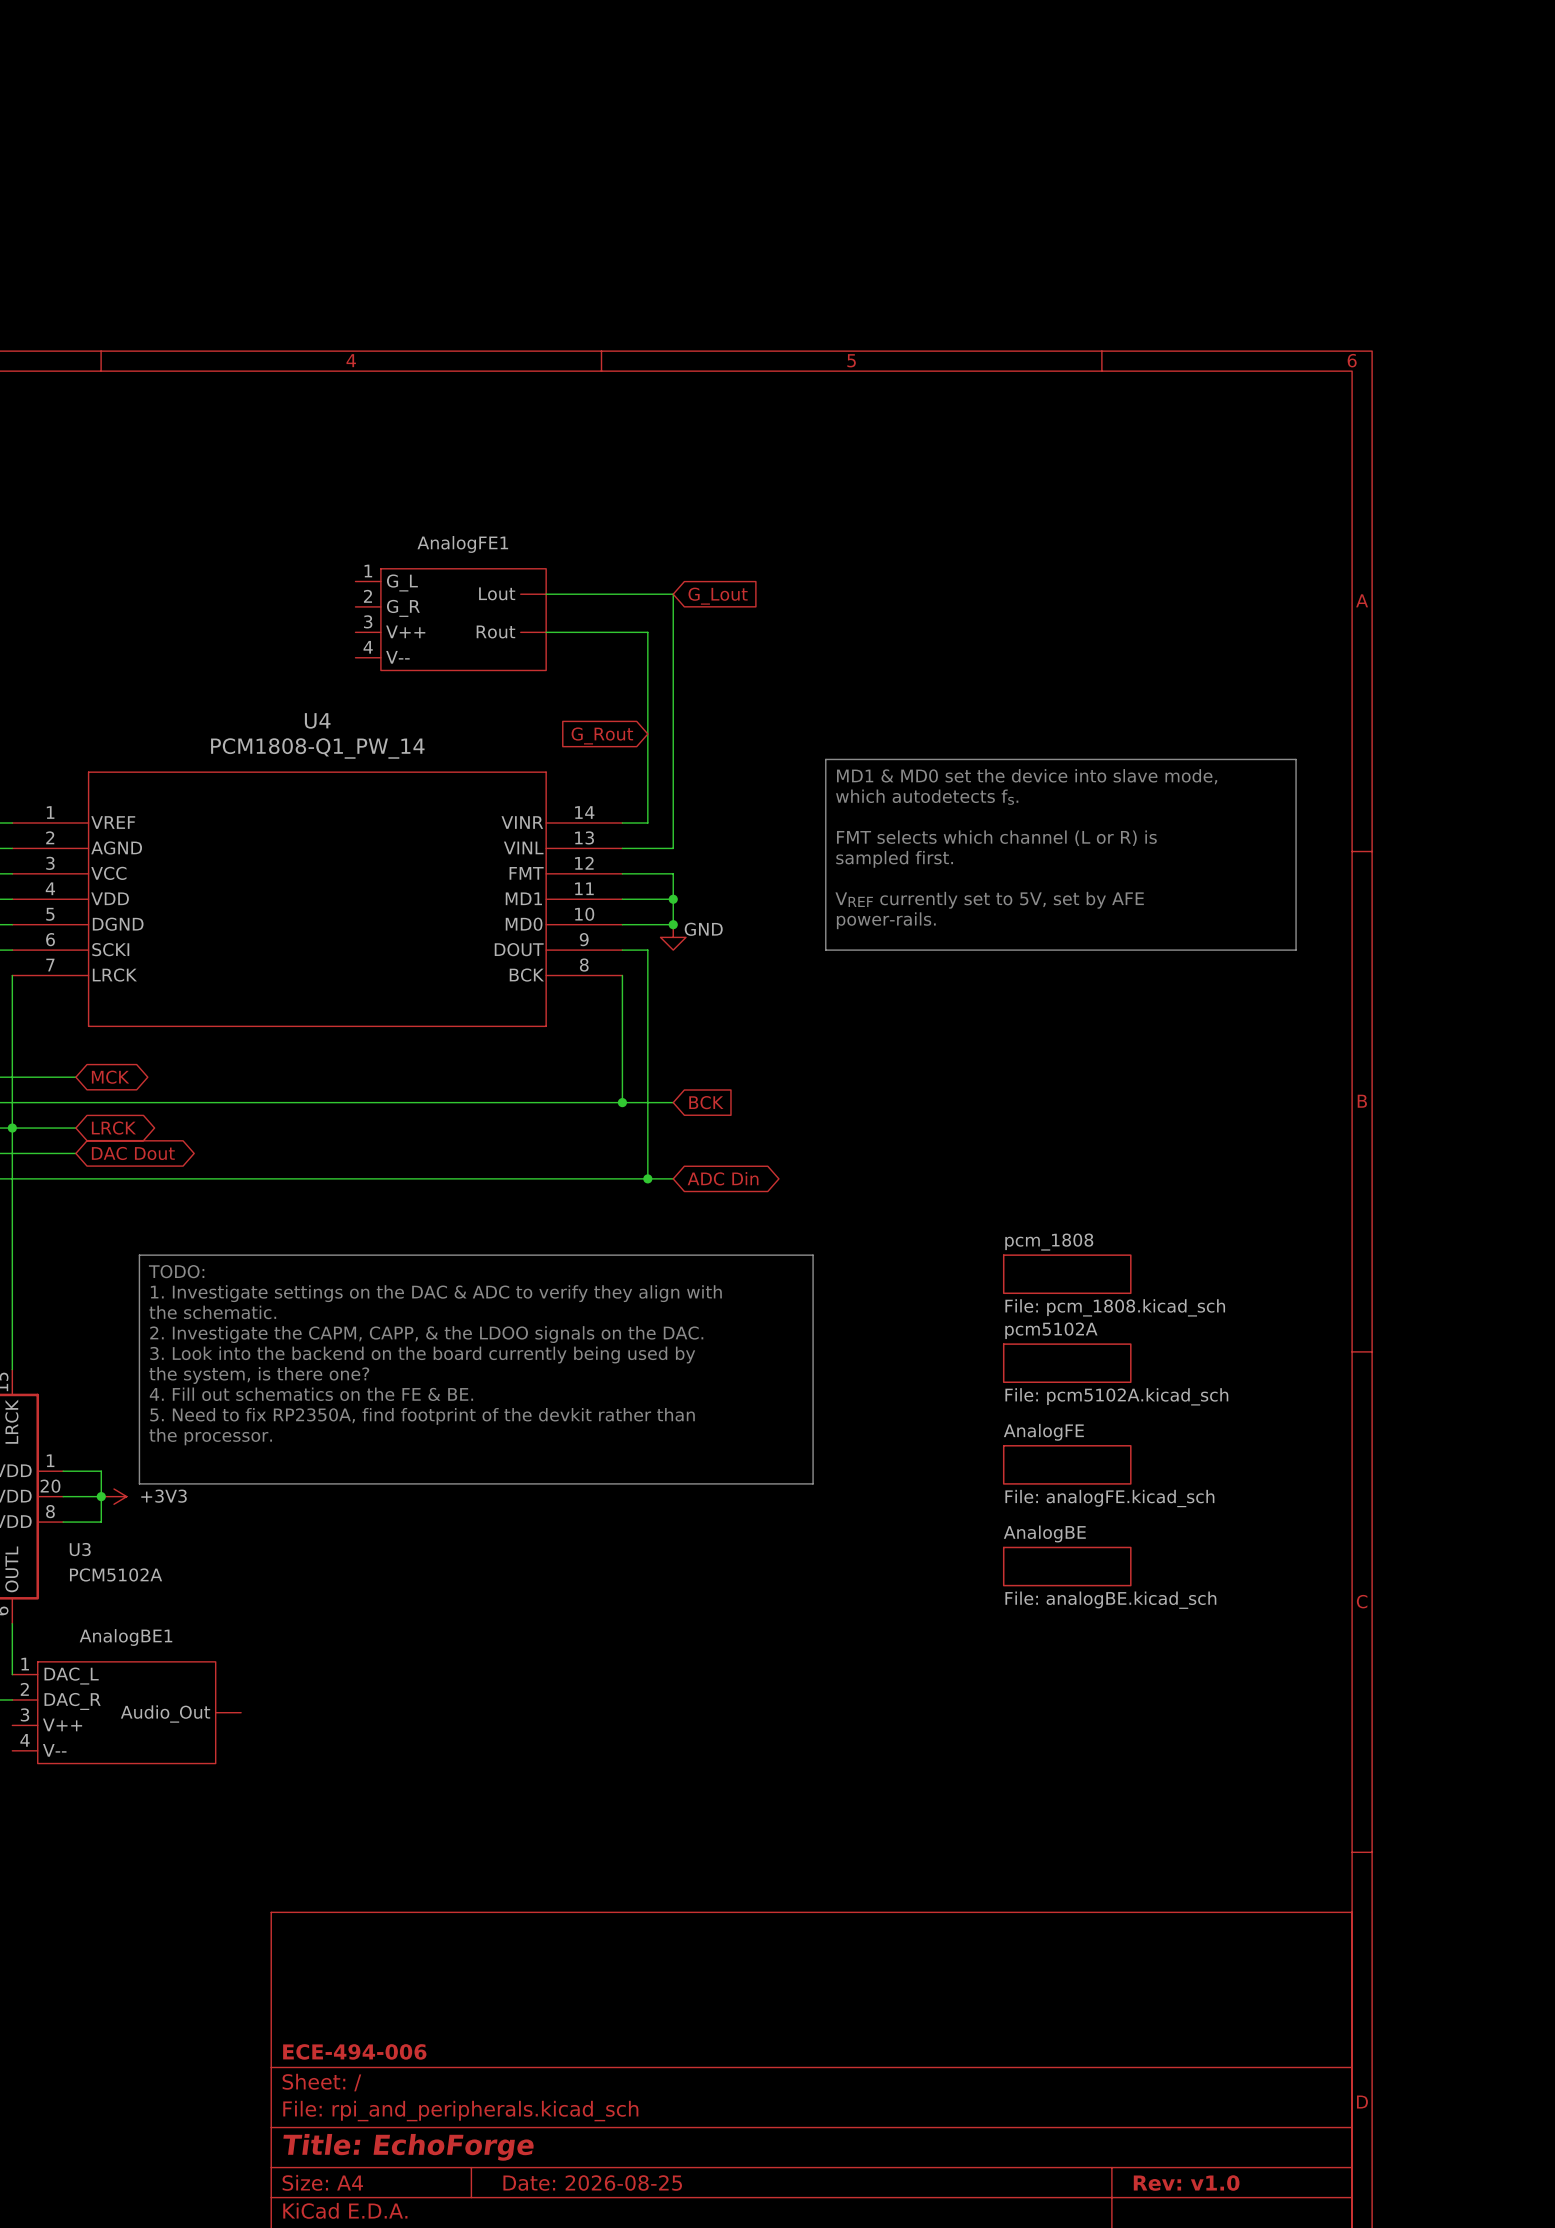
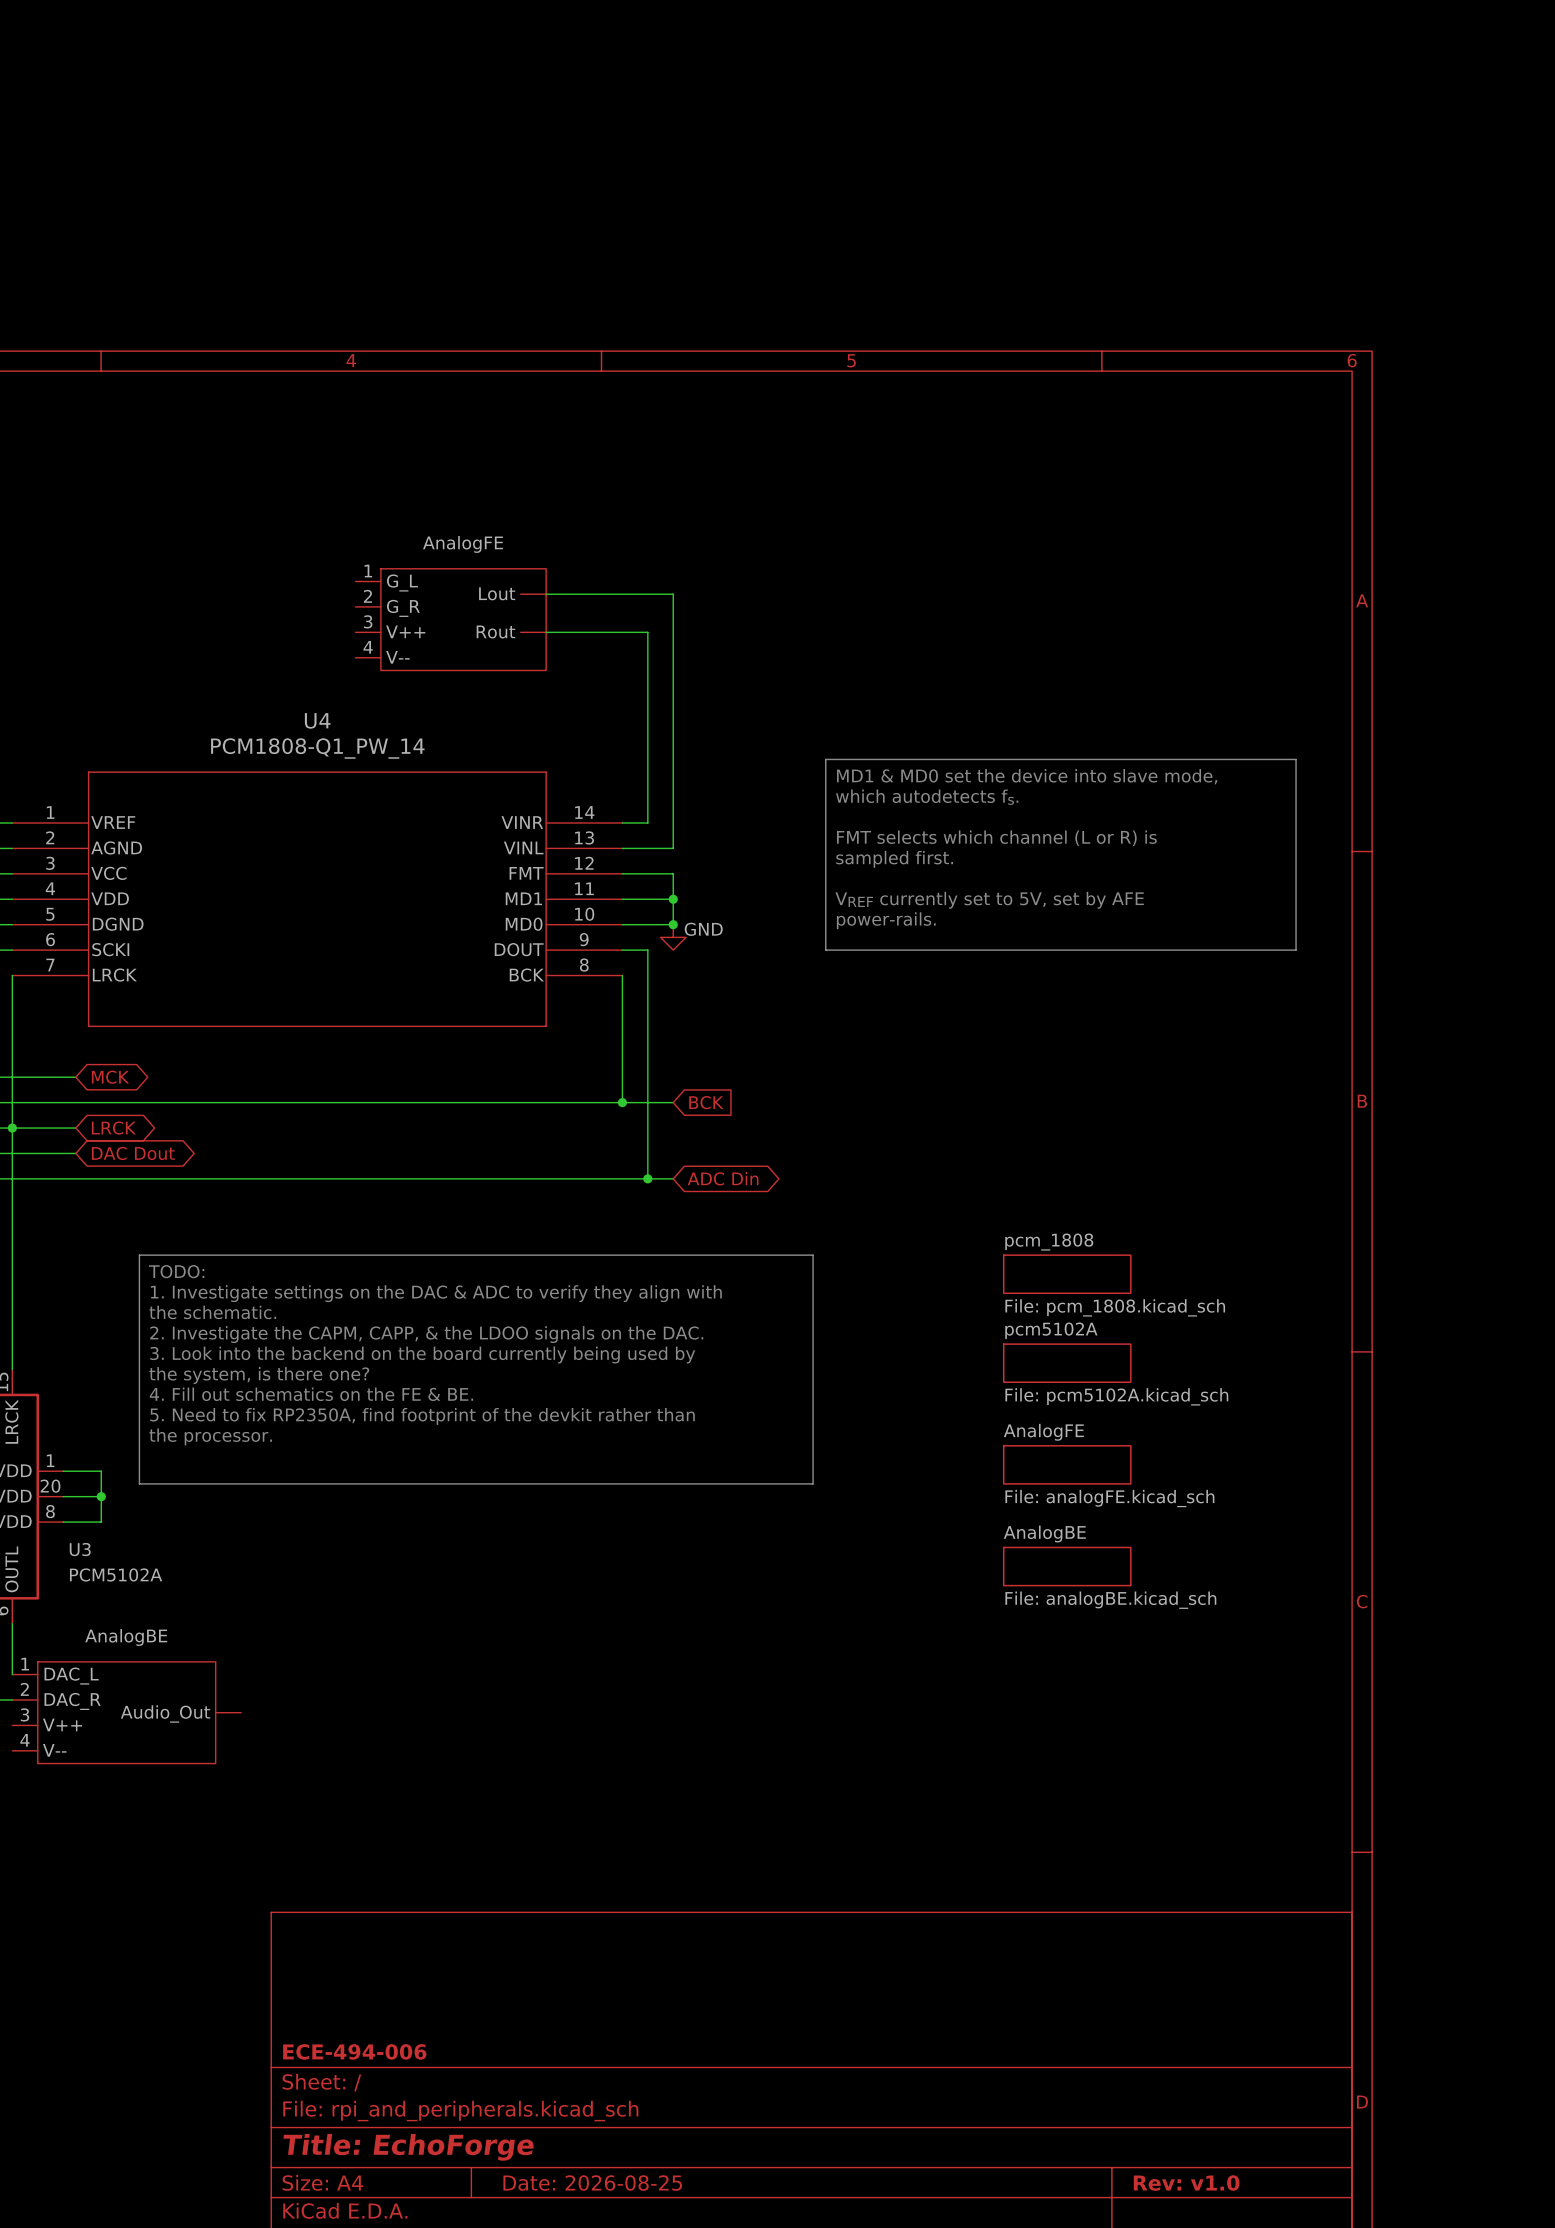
AnalogFE1 name: AnalogFE1 (462, 544) -> AnalogFE (463, 544)
global label: G_Lout (718, 596) -> none
global label: G_Rout (602, 735) -> none
power symbol: +3V3 (114, 1496) -> none
AnalogBE1 name: AnalogBE1 (125, 1637) -> AnalogBE (126, 1637)

